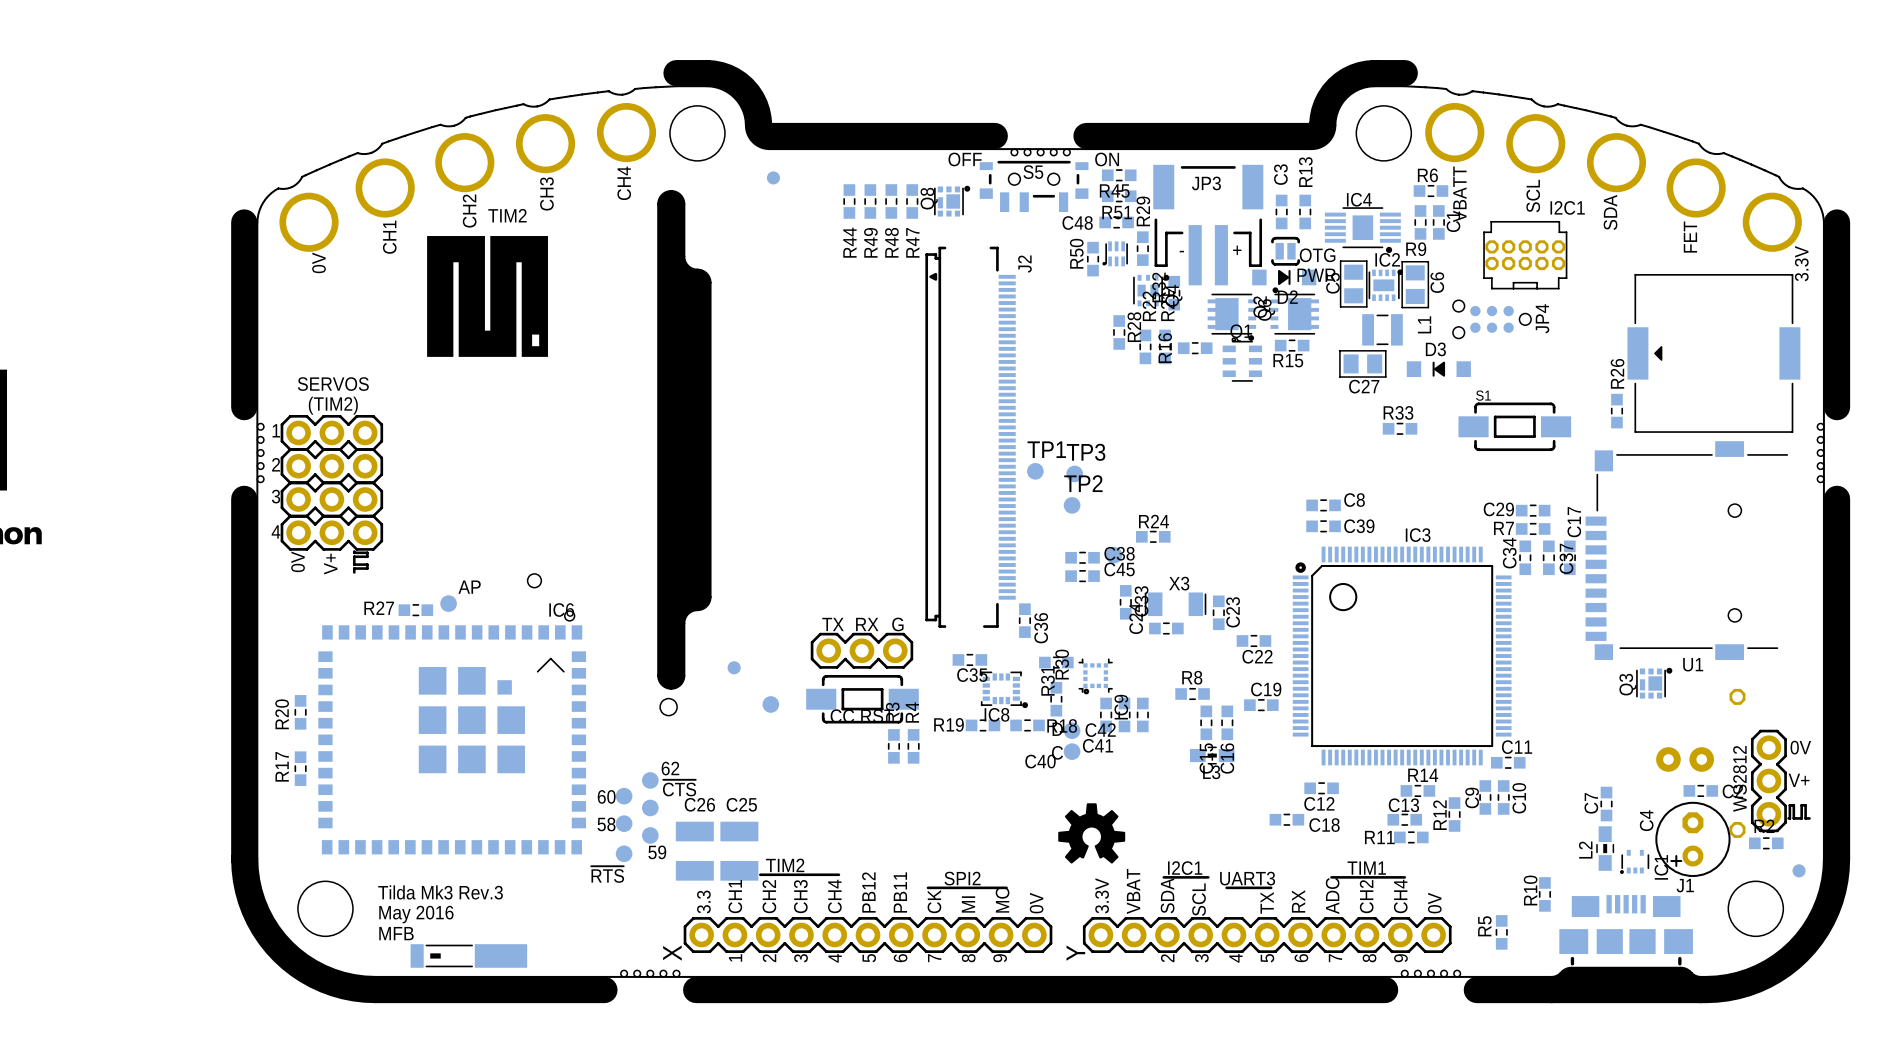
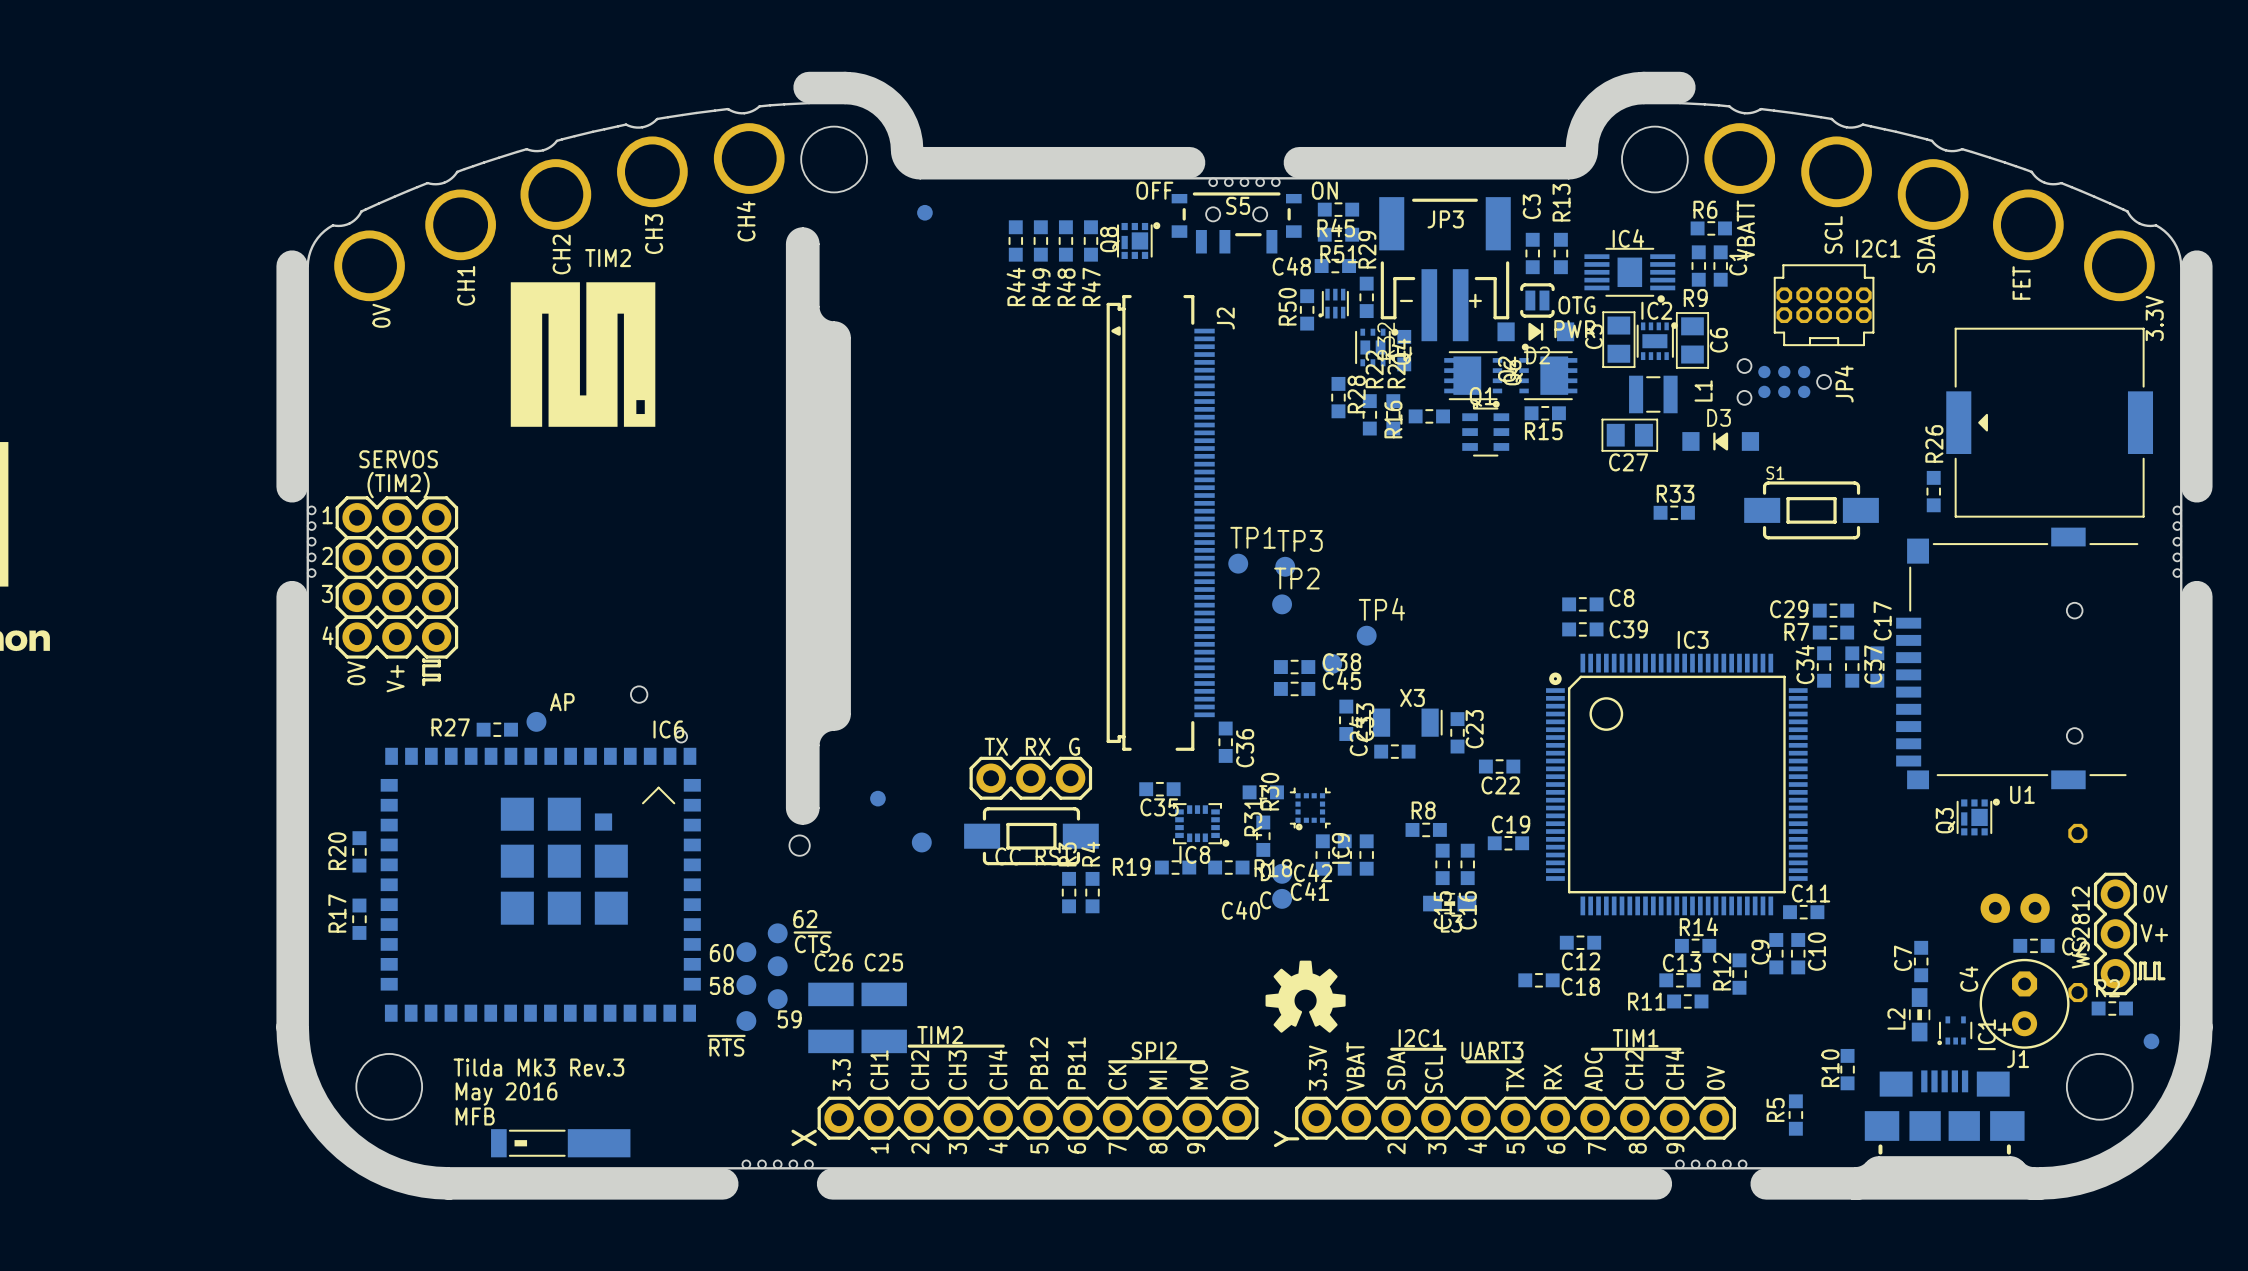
TP4: none -> (1366, 635)
R24: (1153, 536) -> none

